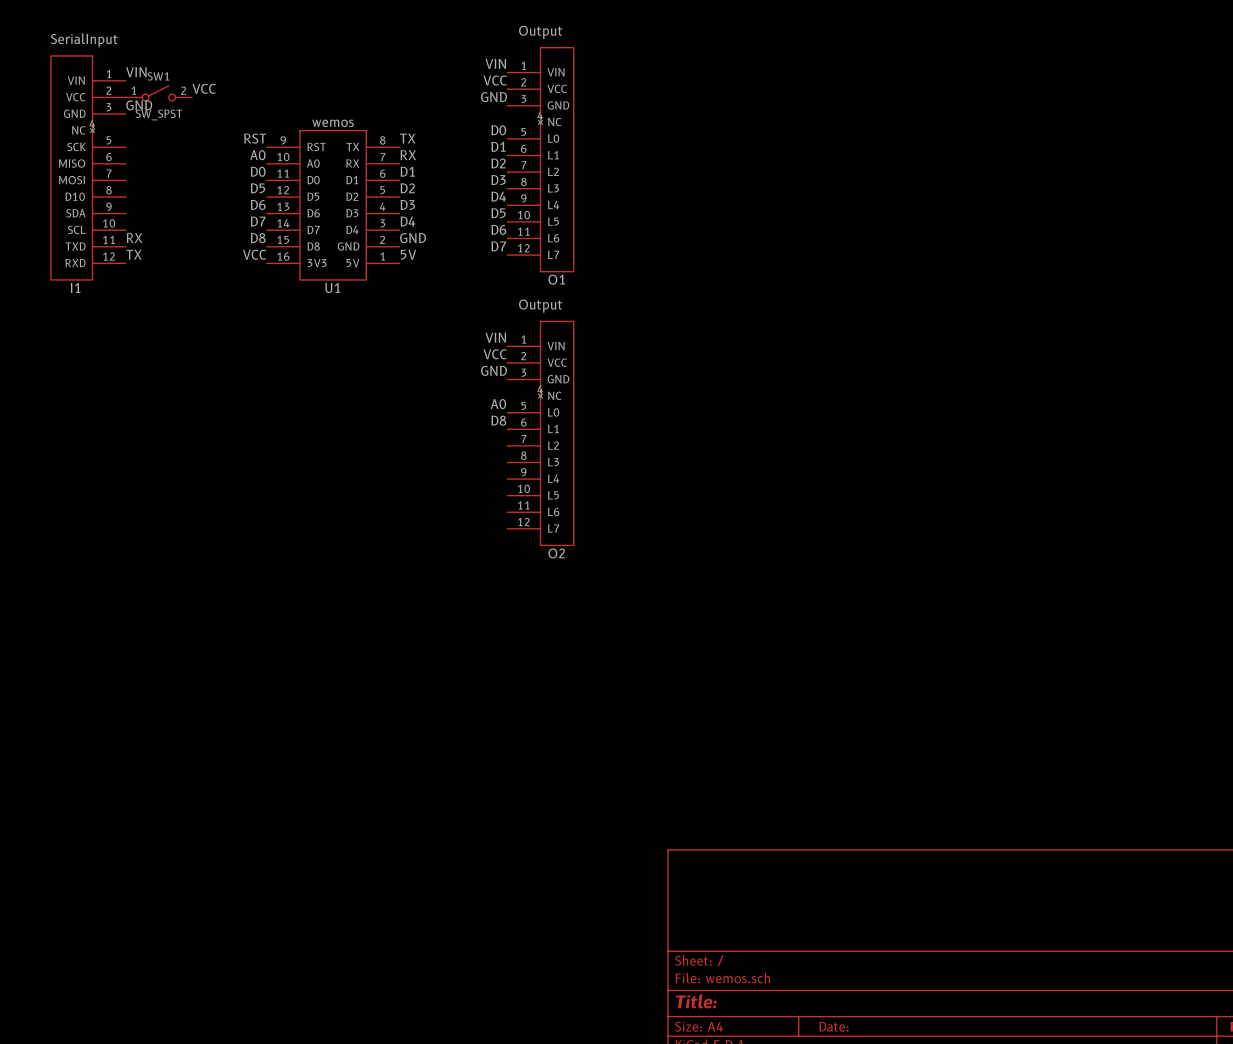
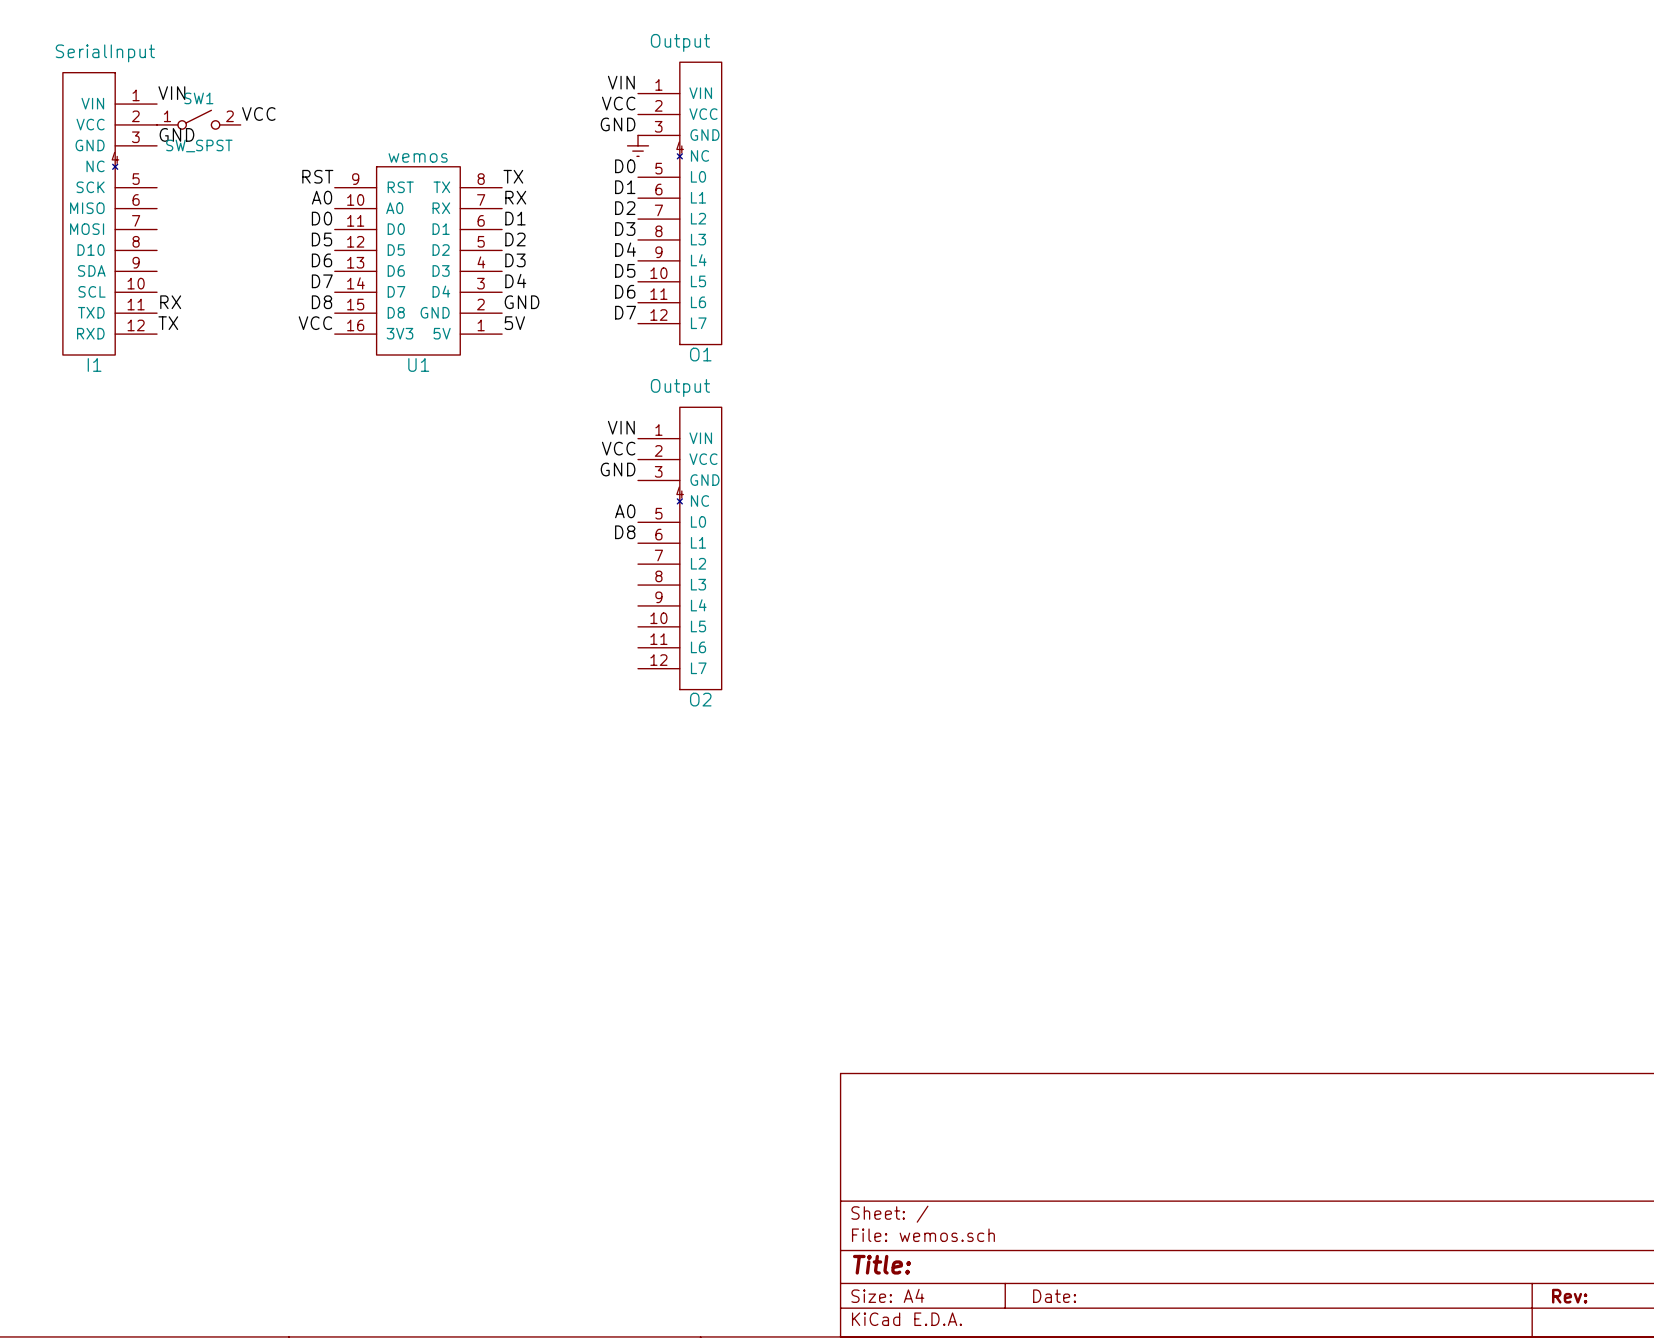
power symbol: none -> (638, 145)

